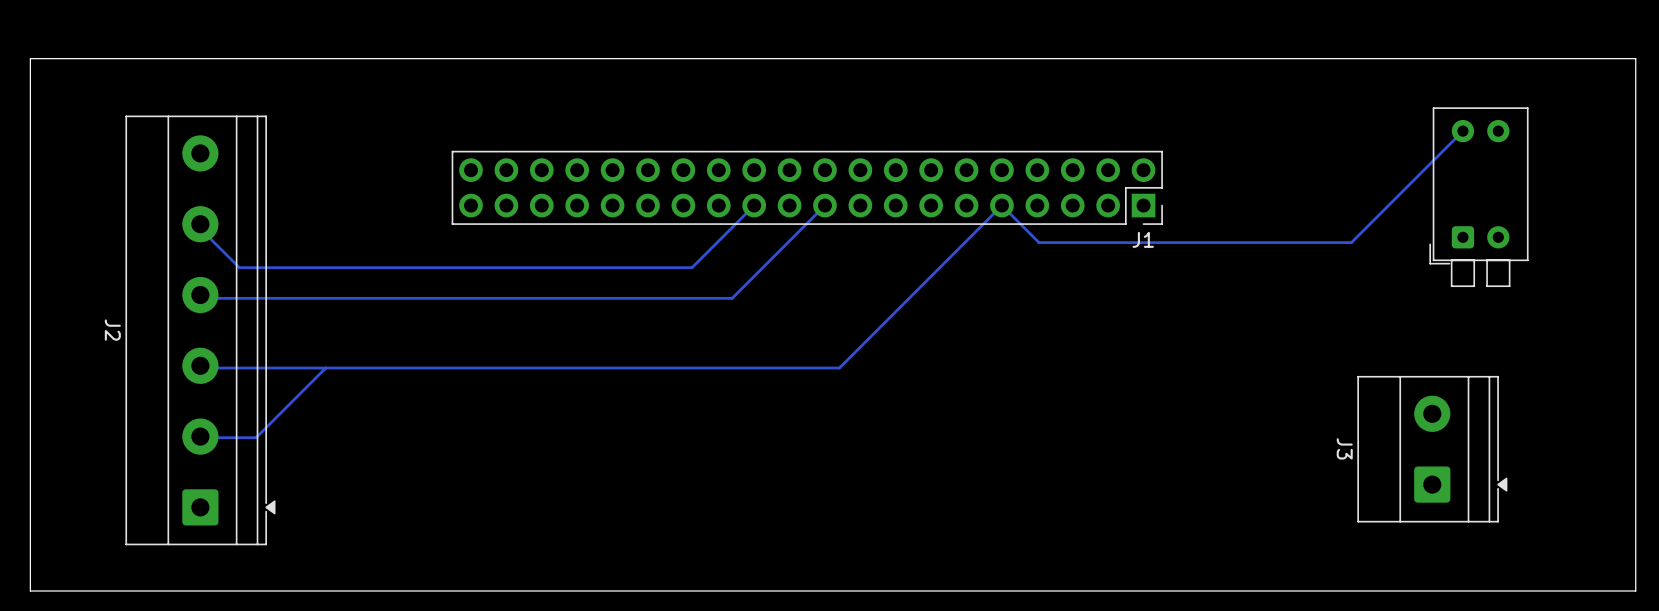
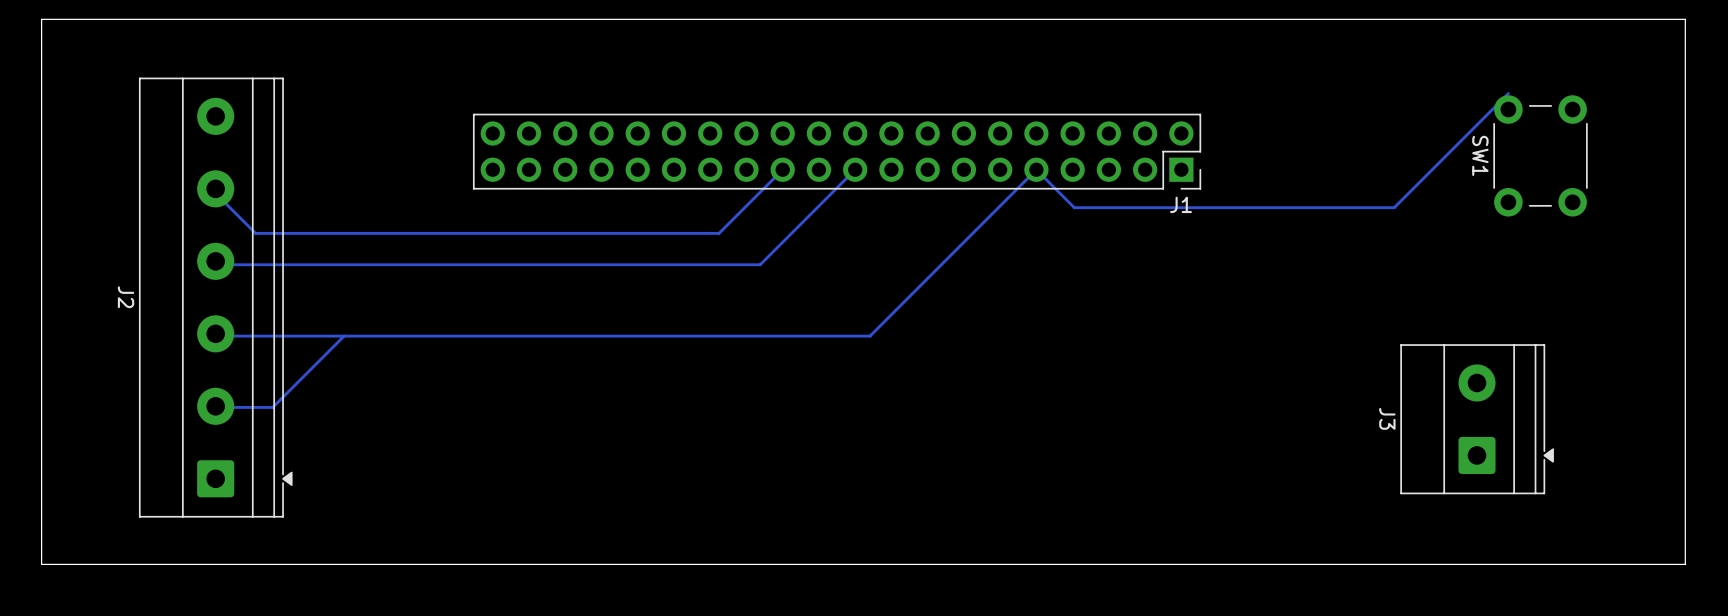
SW1: none -> (1540, 155)
part: (1478, 197) -> none

